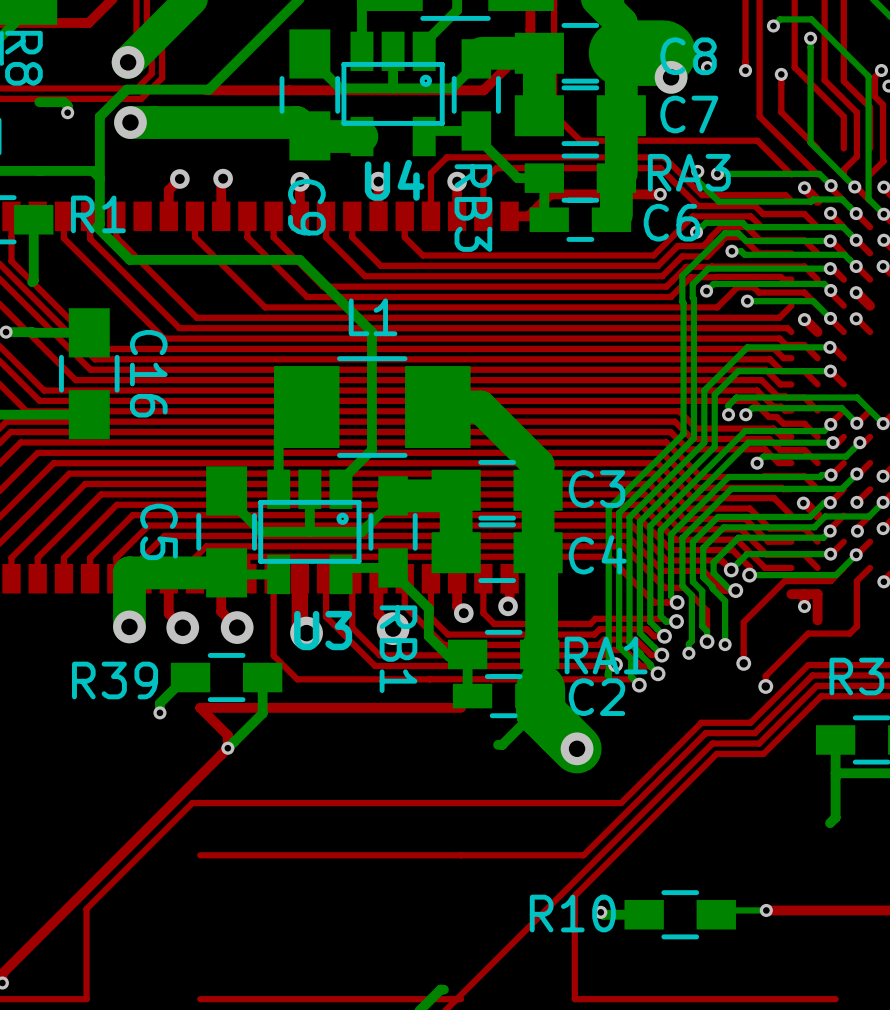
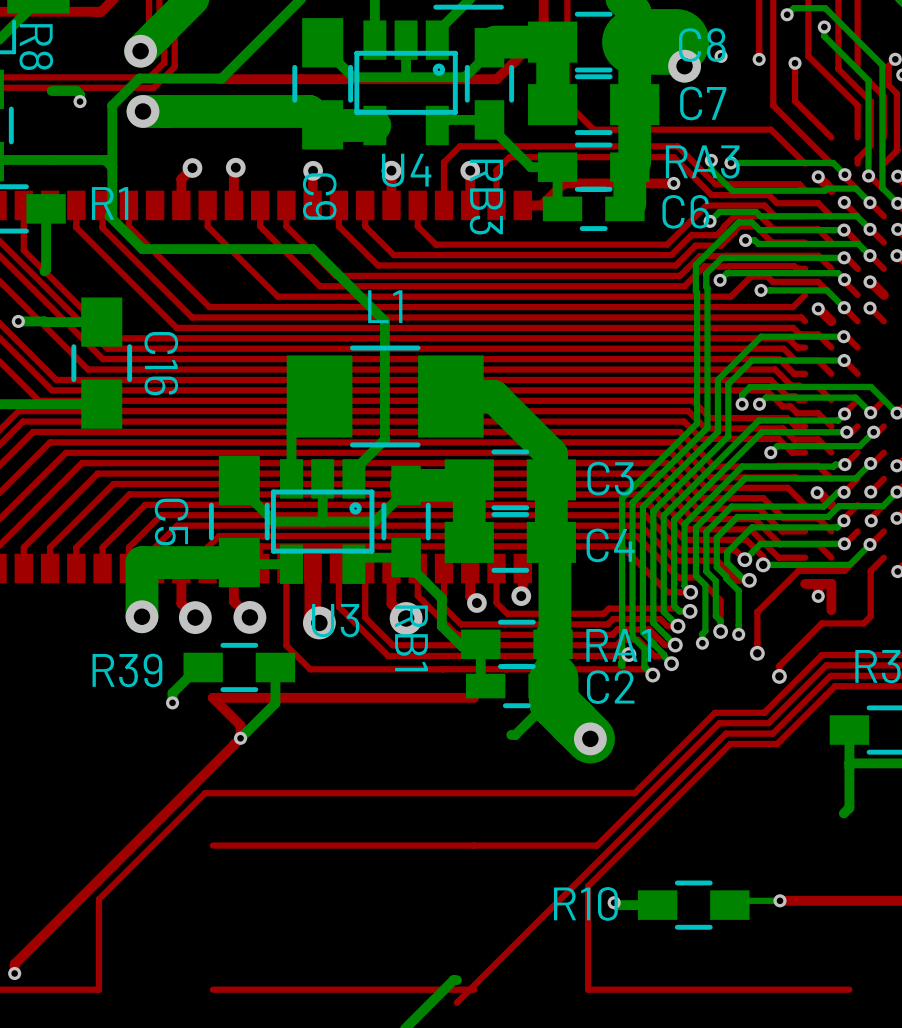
bottom track: (810, 47) (810, 142) (854, 186) -> (824, 36) (868, 80) (868, 175)

